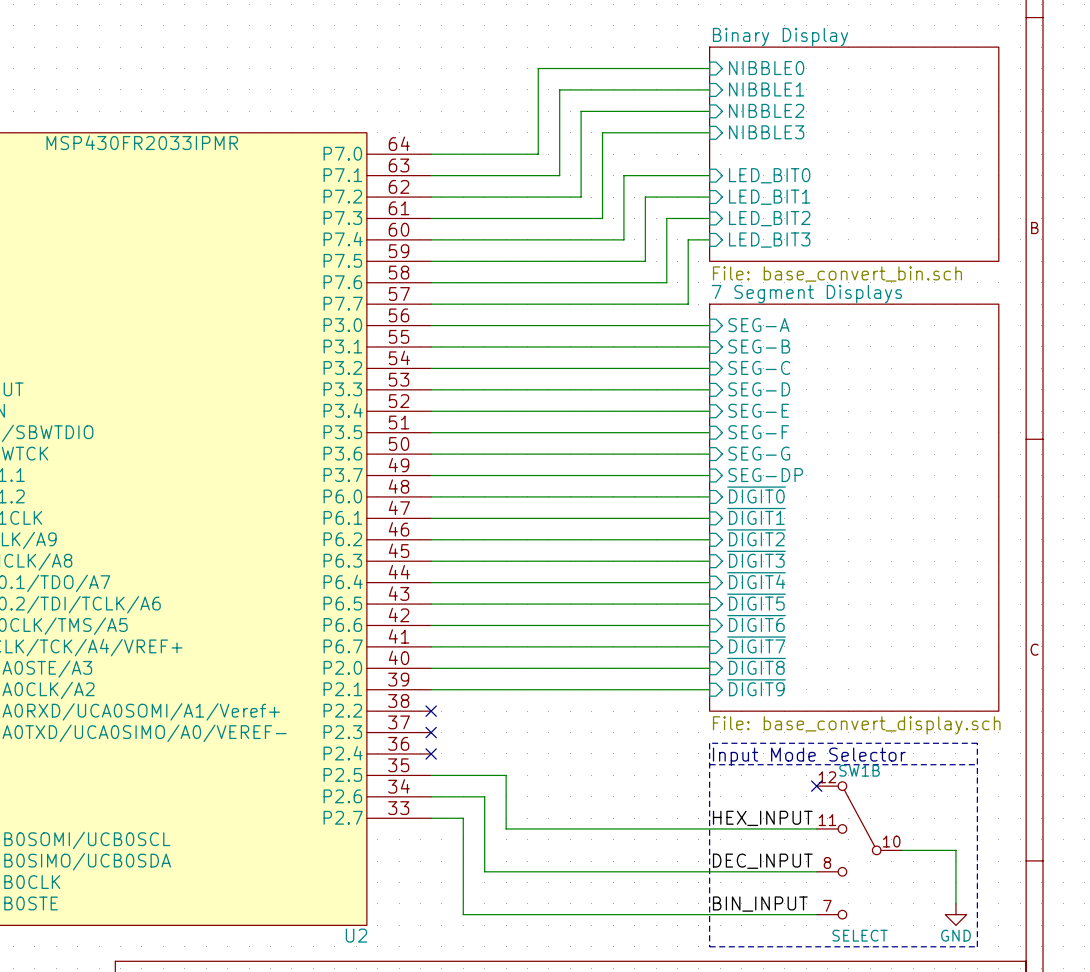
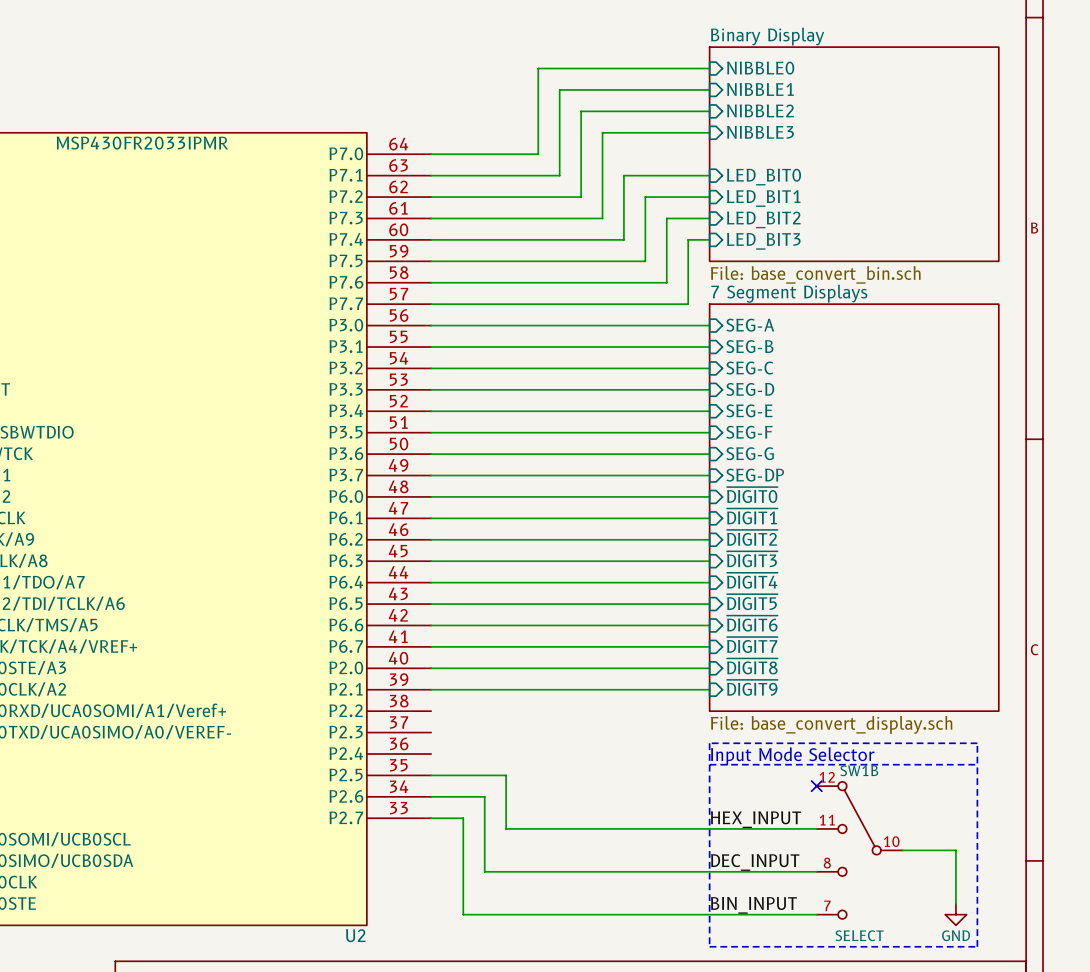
no-connect mark: (431, 711) -> none
no-connect mark: (431, 732) -> none
no-connect mark: (431, 753) -> none

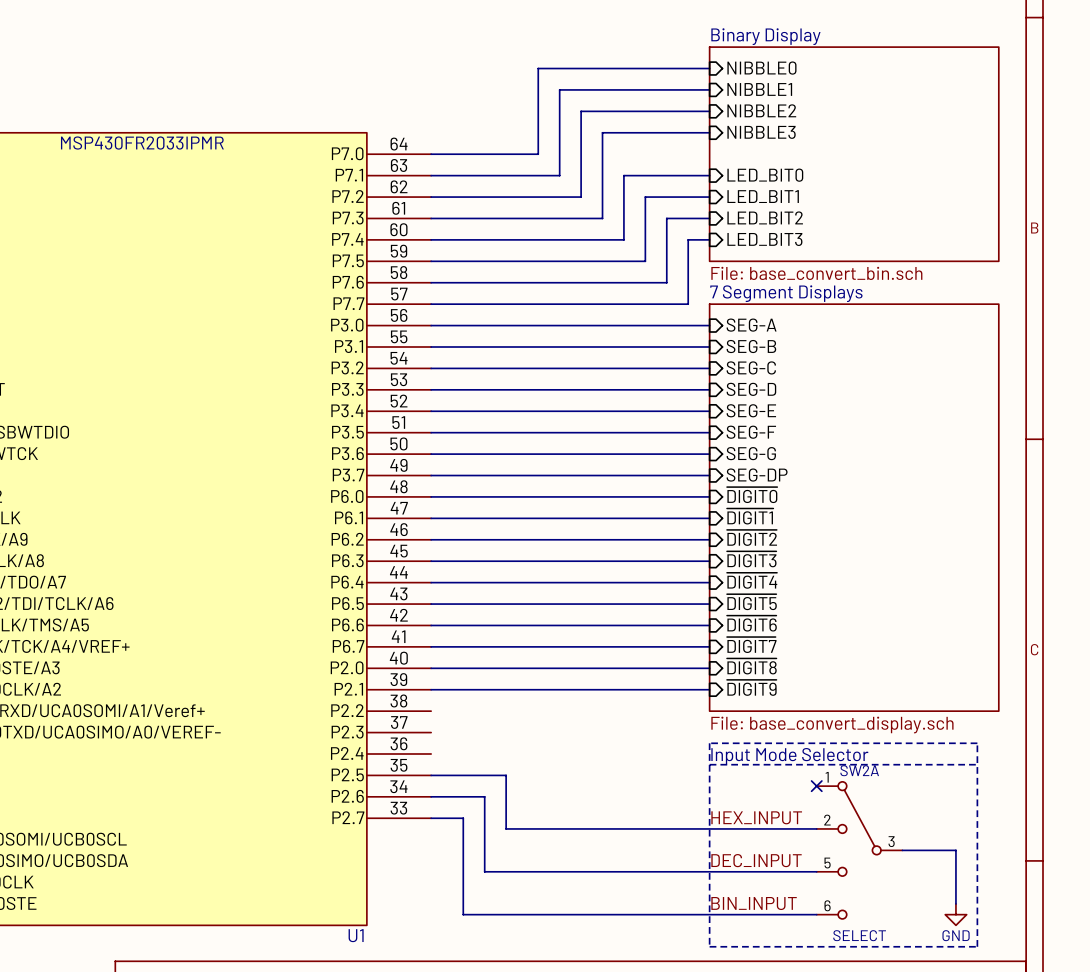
SW1B name: SW1B (859, 770) -> SW2A (859, 770)
SW1B pin number: 12 (827, 777) -> 1 (827, 777)
SW1B pin number: 11 (827, 820) -> 2 (827, 820)
SW1B pin number: 10 (891, 841) -> 3 (891, 841)
SW1B pin number: 8 (827, 863) -> 5 (827, 863)
SW1B pin number: 7 (827, 905) -> 6 (827, 905)
U2 name: U2 (355, 935) -> U1 (356, 935)

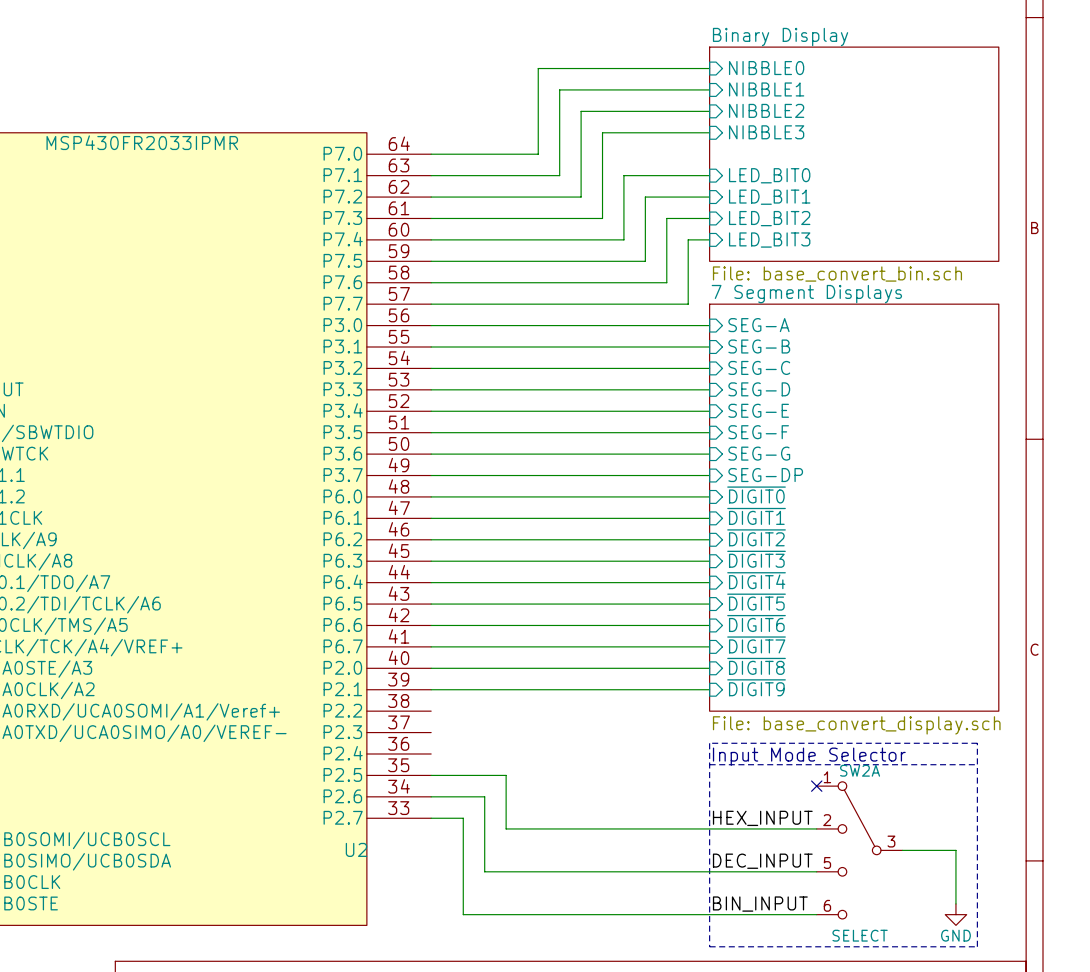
U1 name: U1 (356, 935) -> U2 (356, 849)

